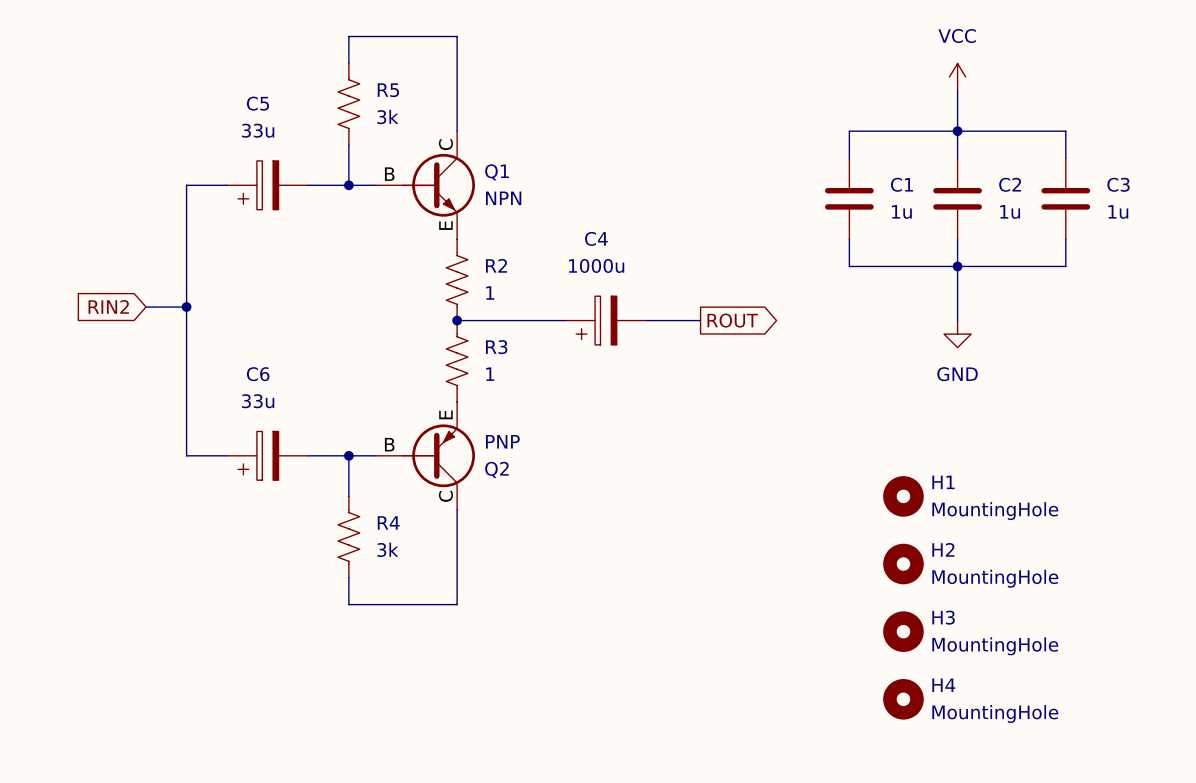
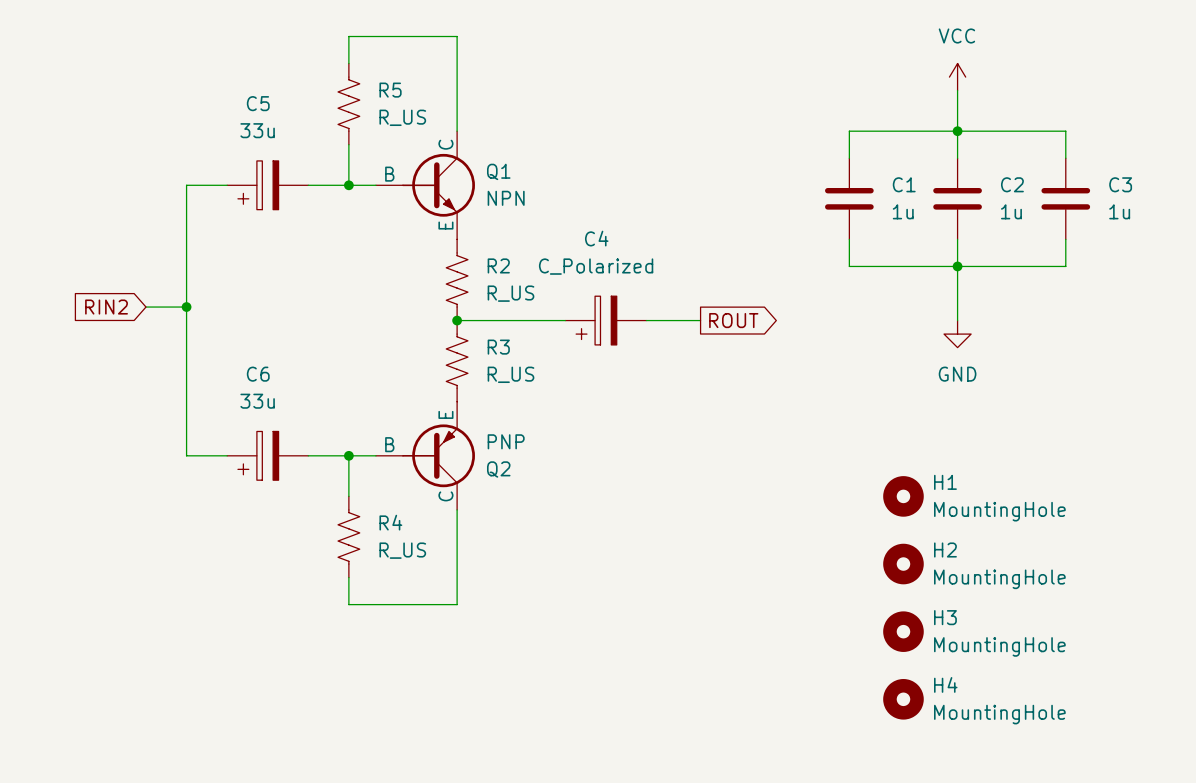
R5 value: 3k (387, 117) -> R_US (402, 117)
C4 value: 1000u (596, 265) -> C_Polarized (596, 266)
R2 value: 1 (490, 293) -> R_US (510, 293)
R3 value: 1 (490, 374) -> R_US (510, 374)
R4 value: 3k (387, 549) -> R_US (402, 550)

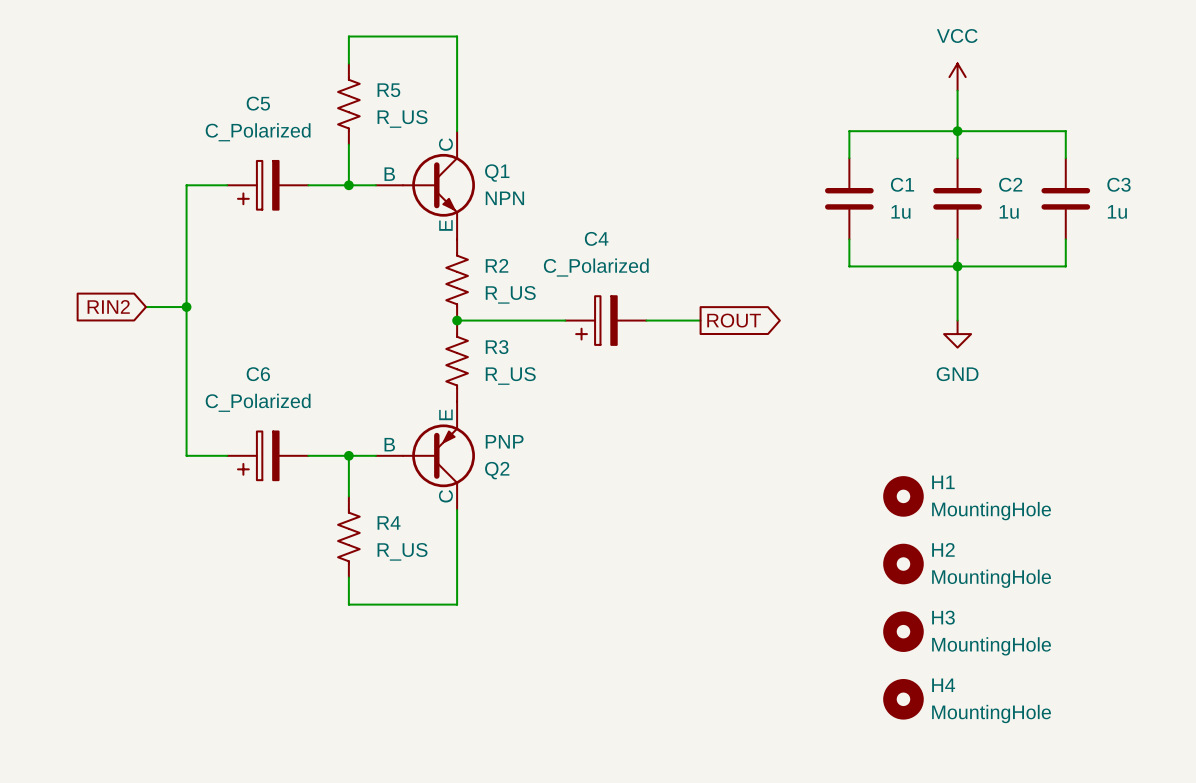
C5 value: 33u (257, 130) -> C_Polarized (258, 132)
C6 value: 33u (257, 401) -> C_Polarized (258, 402)

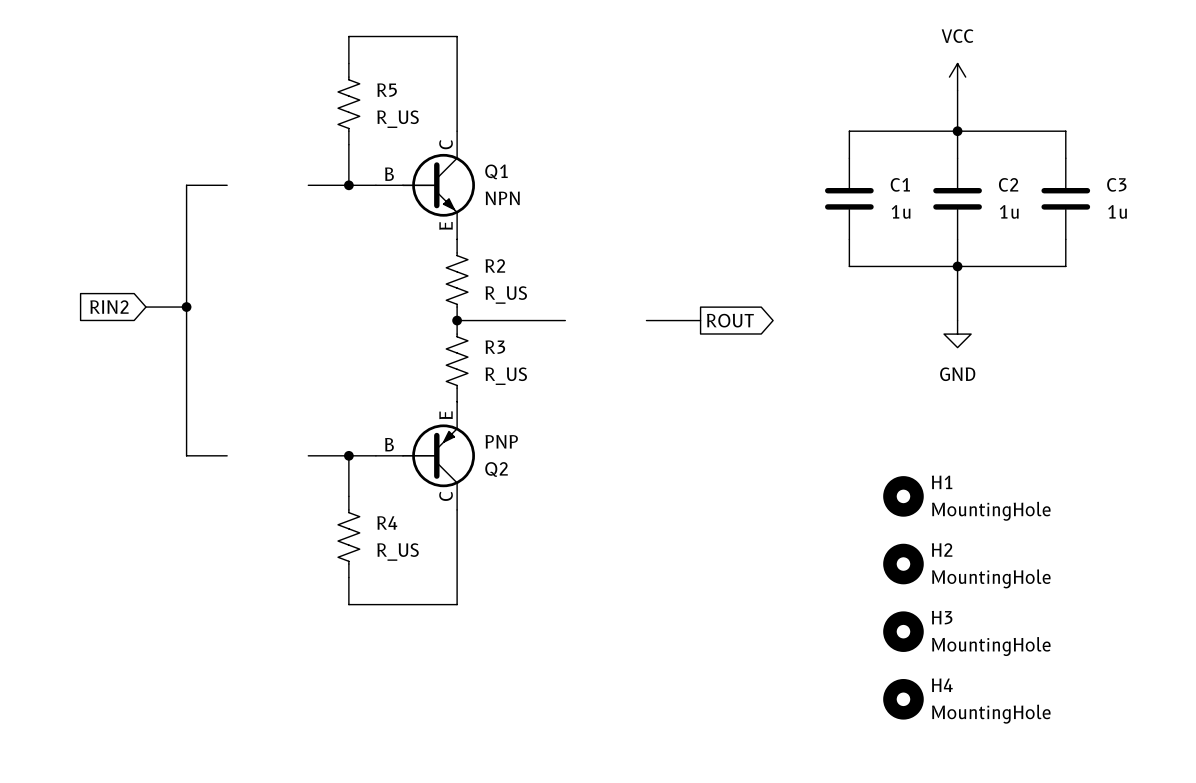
C5: C_Polarized (267, 185) -> none
C4: C_Polarized (605, 320) -> none
C6: C_Polarized (267, 455) -> none

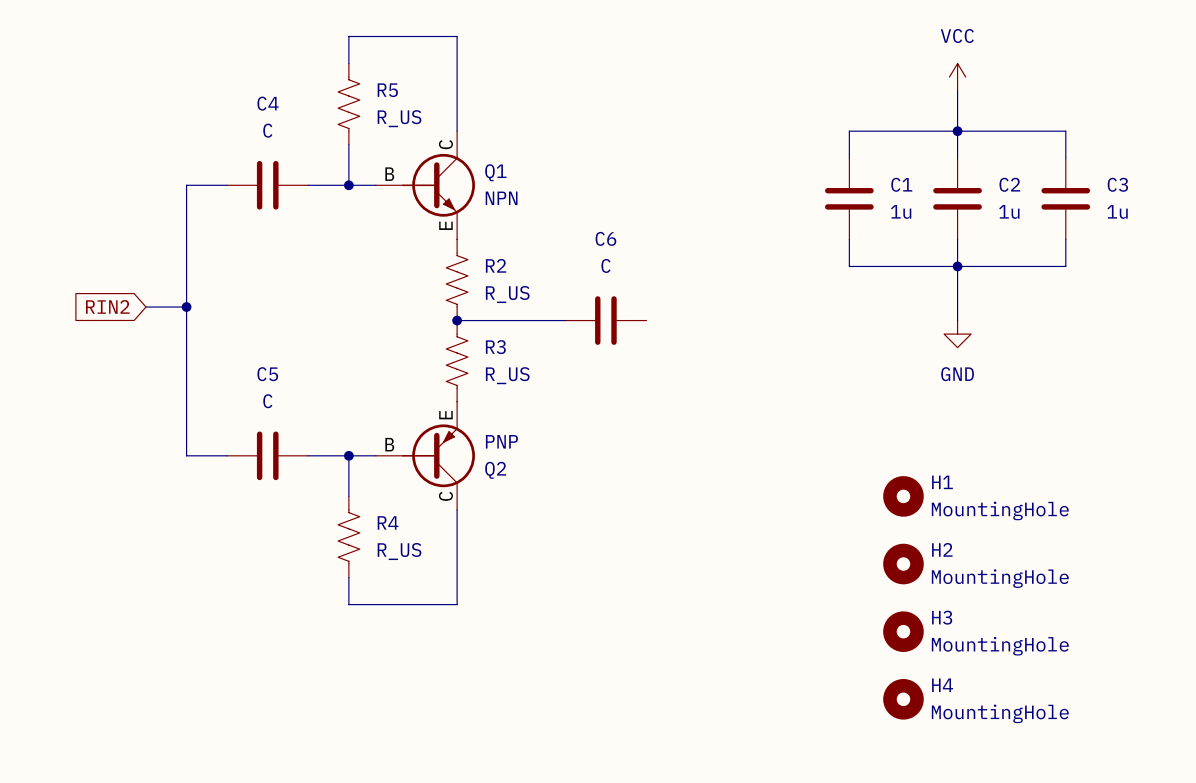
C4: none -> C (267, 185)
C6: none -> C (605, 320)
wire: (646, 320) (700, 320) -> none
global label: ROUT (730, 320) -> none
C5: none -> C (267, 455)

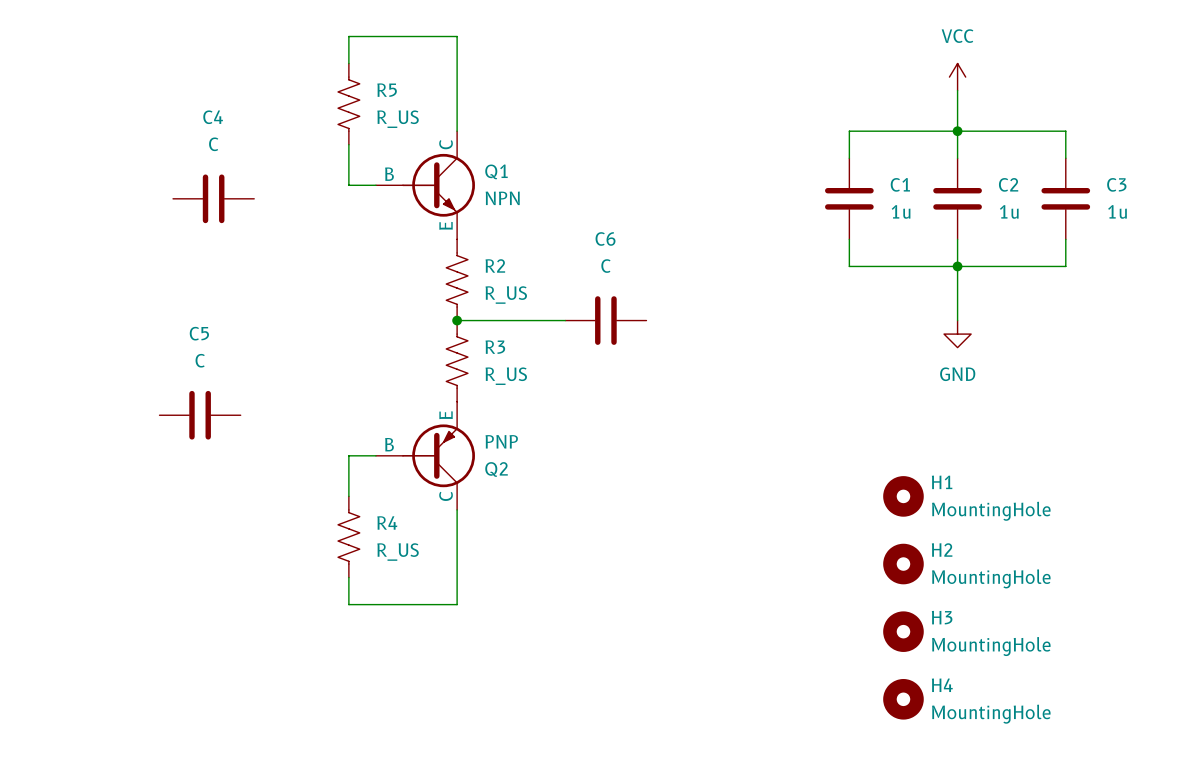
wire: (227, 185) (186, 185) (186, 455) (227, 455) -> none
C4 position: (267, 185) -> (213, 198)
wire: (308, 185) (348, 185) -> none
junction: (348, 185) -> none
global label: RIN2 (107, 306) -> none
wire: (145, 307) (186, 307) -> none
junction: (186, 307) -> none
C5 position: (267, 455) -> (200, 415)
wire: (308, 455) (348, 455) -> none
junction: (348, 455) -> none

